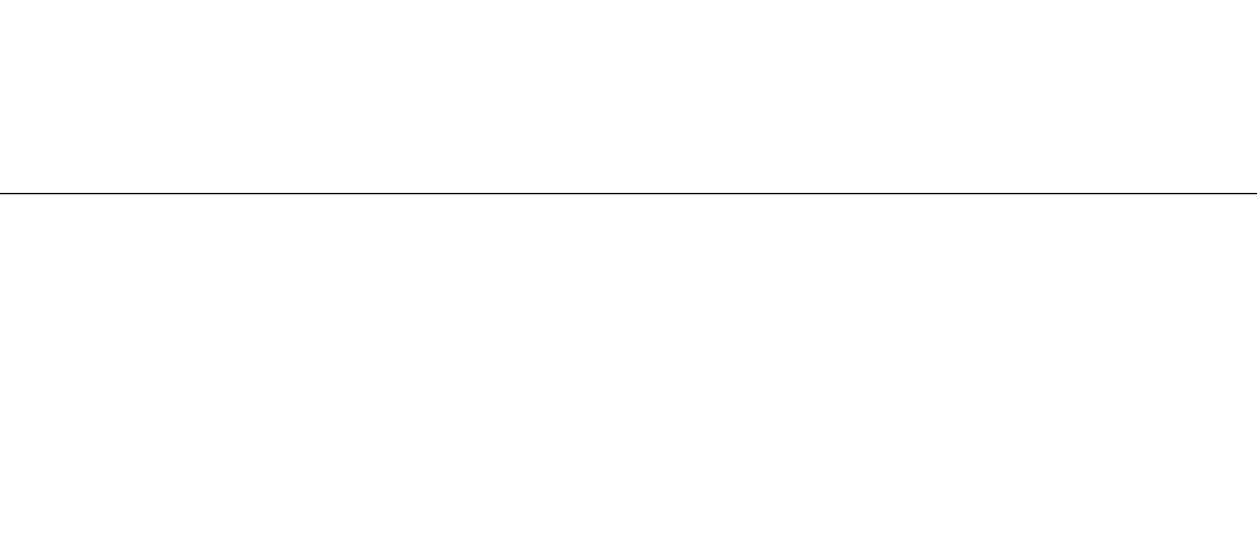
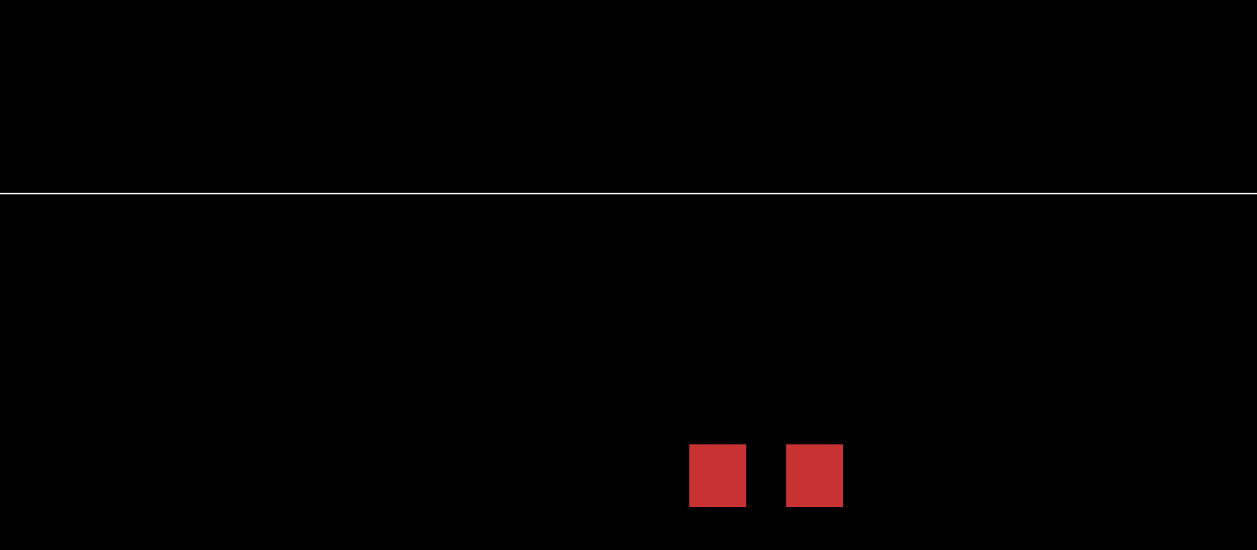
part: none -> (766, 475)

